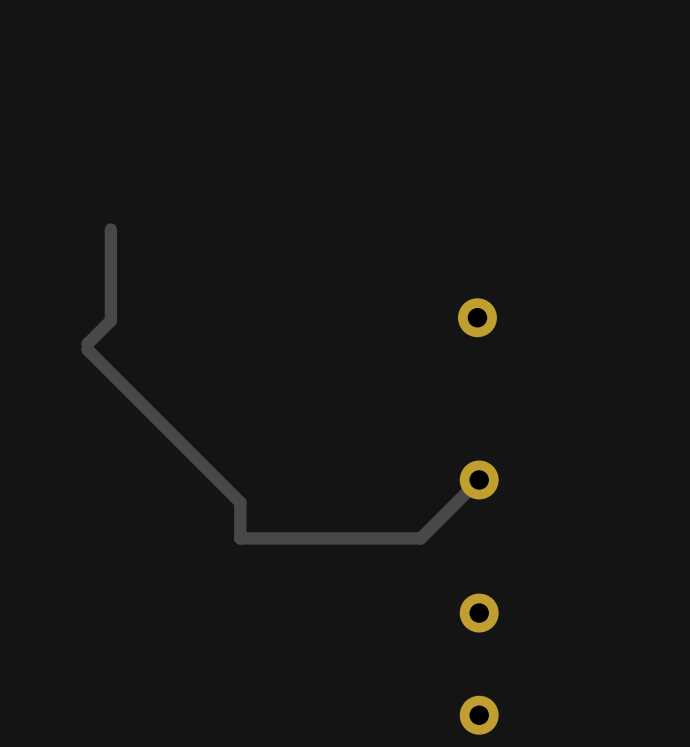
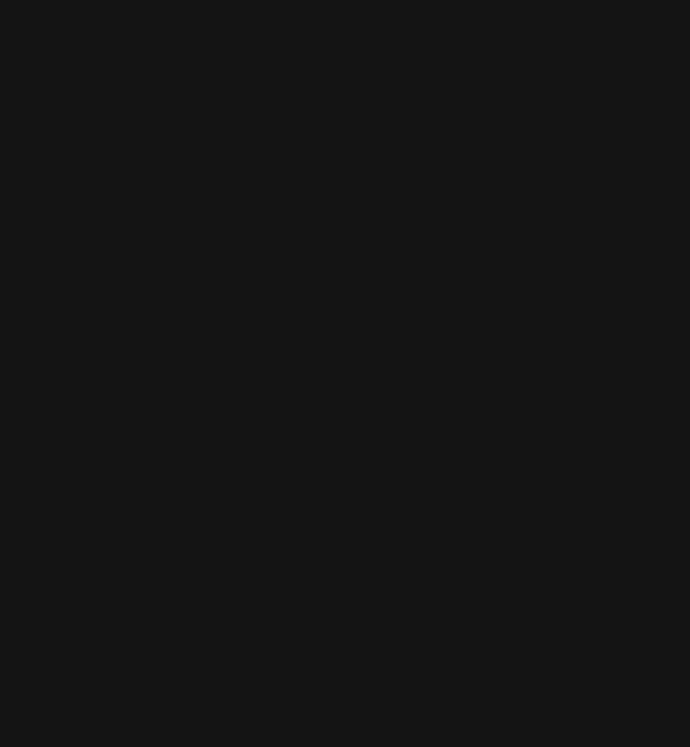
track: (110, 229) (110, 320) (87, 343) (87, 349) (240, 502) (240, 538) (420, 538) (479, 479) -> none
via: (477, 317) -> none
via: (479, 479) -> none
via: (479, 613) -> none
via: (479, 715) -> none

